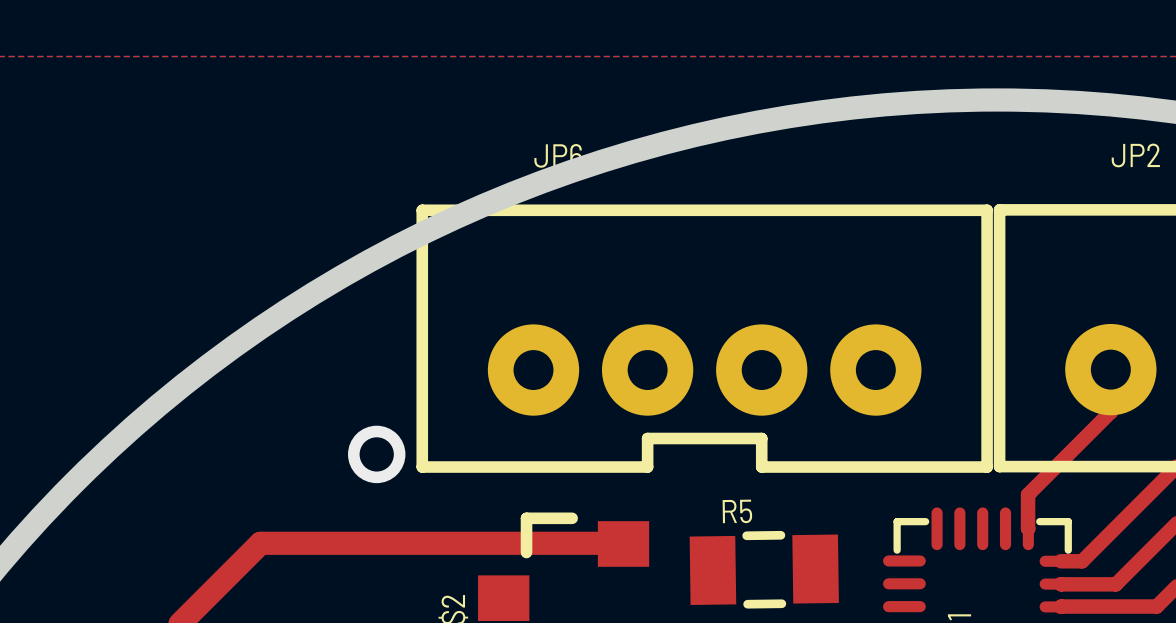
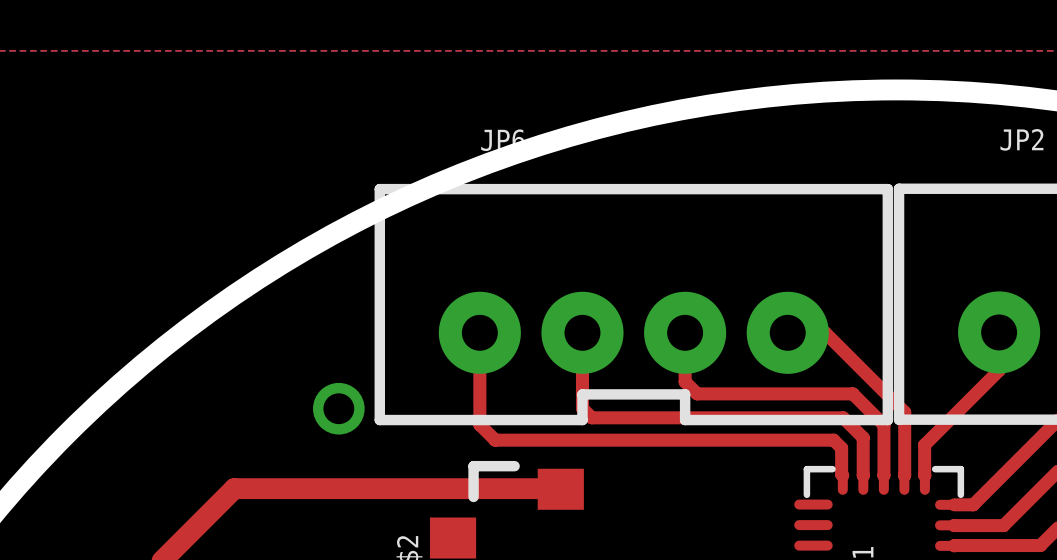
top track: none -> (479, 332) (479, 424) (495, 440) (833, 440) (841, 448) (842, 475)
top track: none -> (582, 332) (582, 408) (591, 417) (843, 417) (863, 437) (863, 475)
top track: none -> (685, 332) (685, 381) (697, 393) (852, 393) (883, 425) (883, 475)
top track: none -> (787, 332) (825, 332) (904, 412) (904, 475)
R5: (764, 569) -> none

